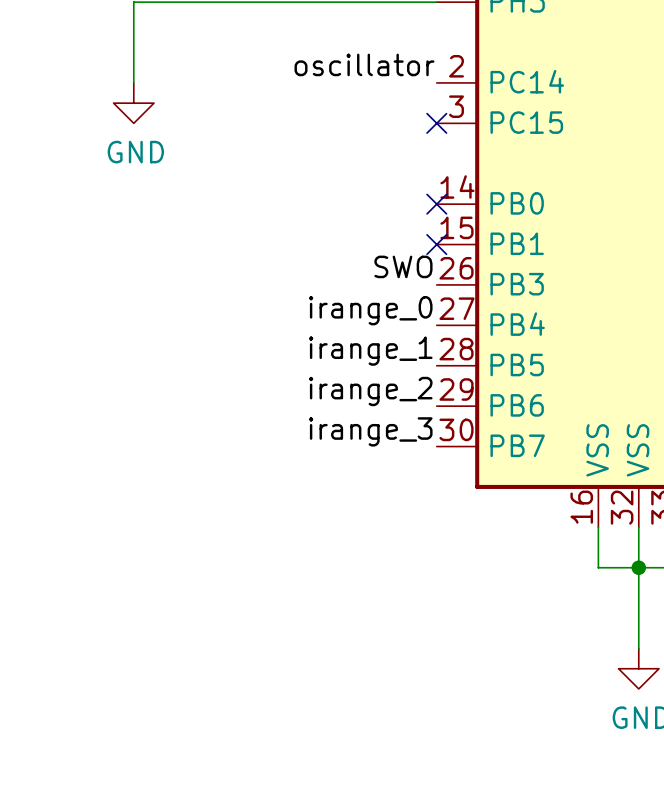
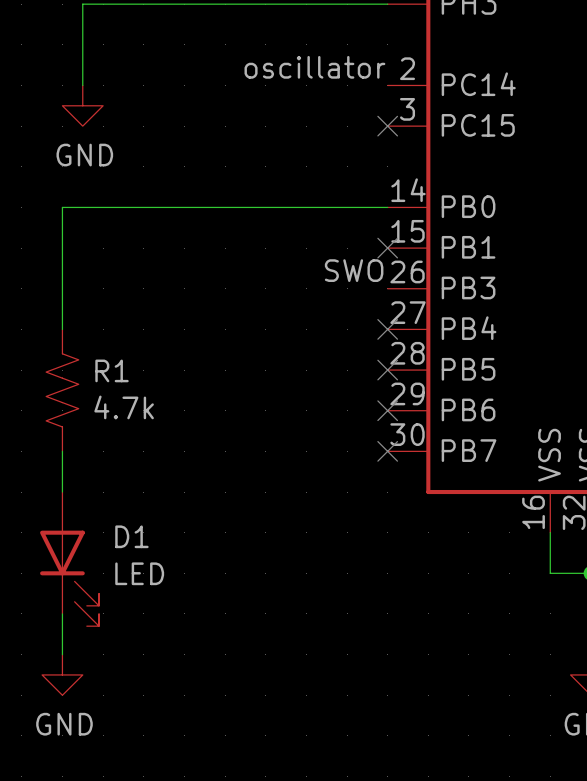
wire: none -> (387, 207) (62, 207) (62, 329)
no-connect mark: (436, 204) -> none
label: irange_0 (370, 310) -> none
no-connect mark: none -> (387, 329)
label: irange_1 (370, 351) -> none
no-connect mark: none -> (387, 370)
R1: none -> 4.7k (62, 390)
label: irange_2 (370, 391) -> none
no-connect mark: none -> (387, 410)
label: irange_3 (370, 431) -> none
wire: none -> (62, 451) (62, 492)
no-connect mark: none -> (387, 451)
D1: none -> LED (69, 559)
wire: none -> (62, 613) (62, 654)
power symbol: none -> GND (62, 674)

